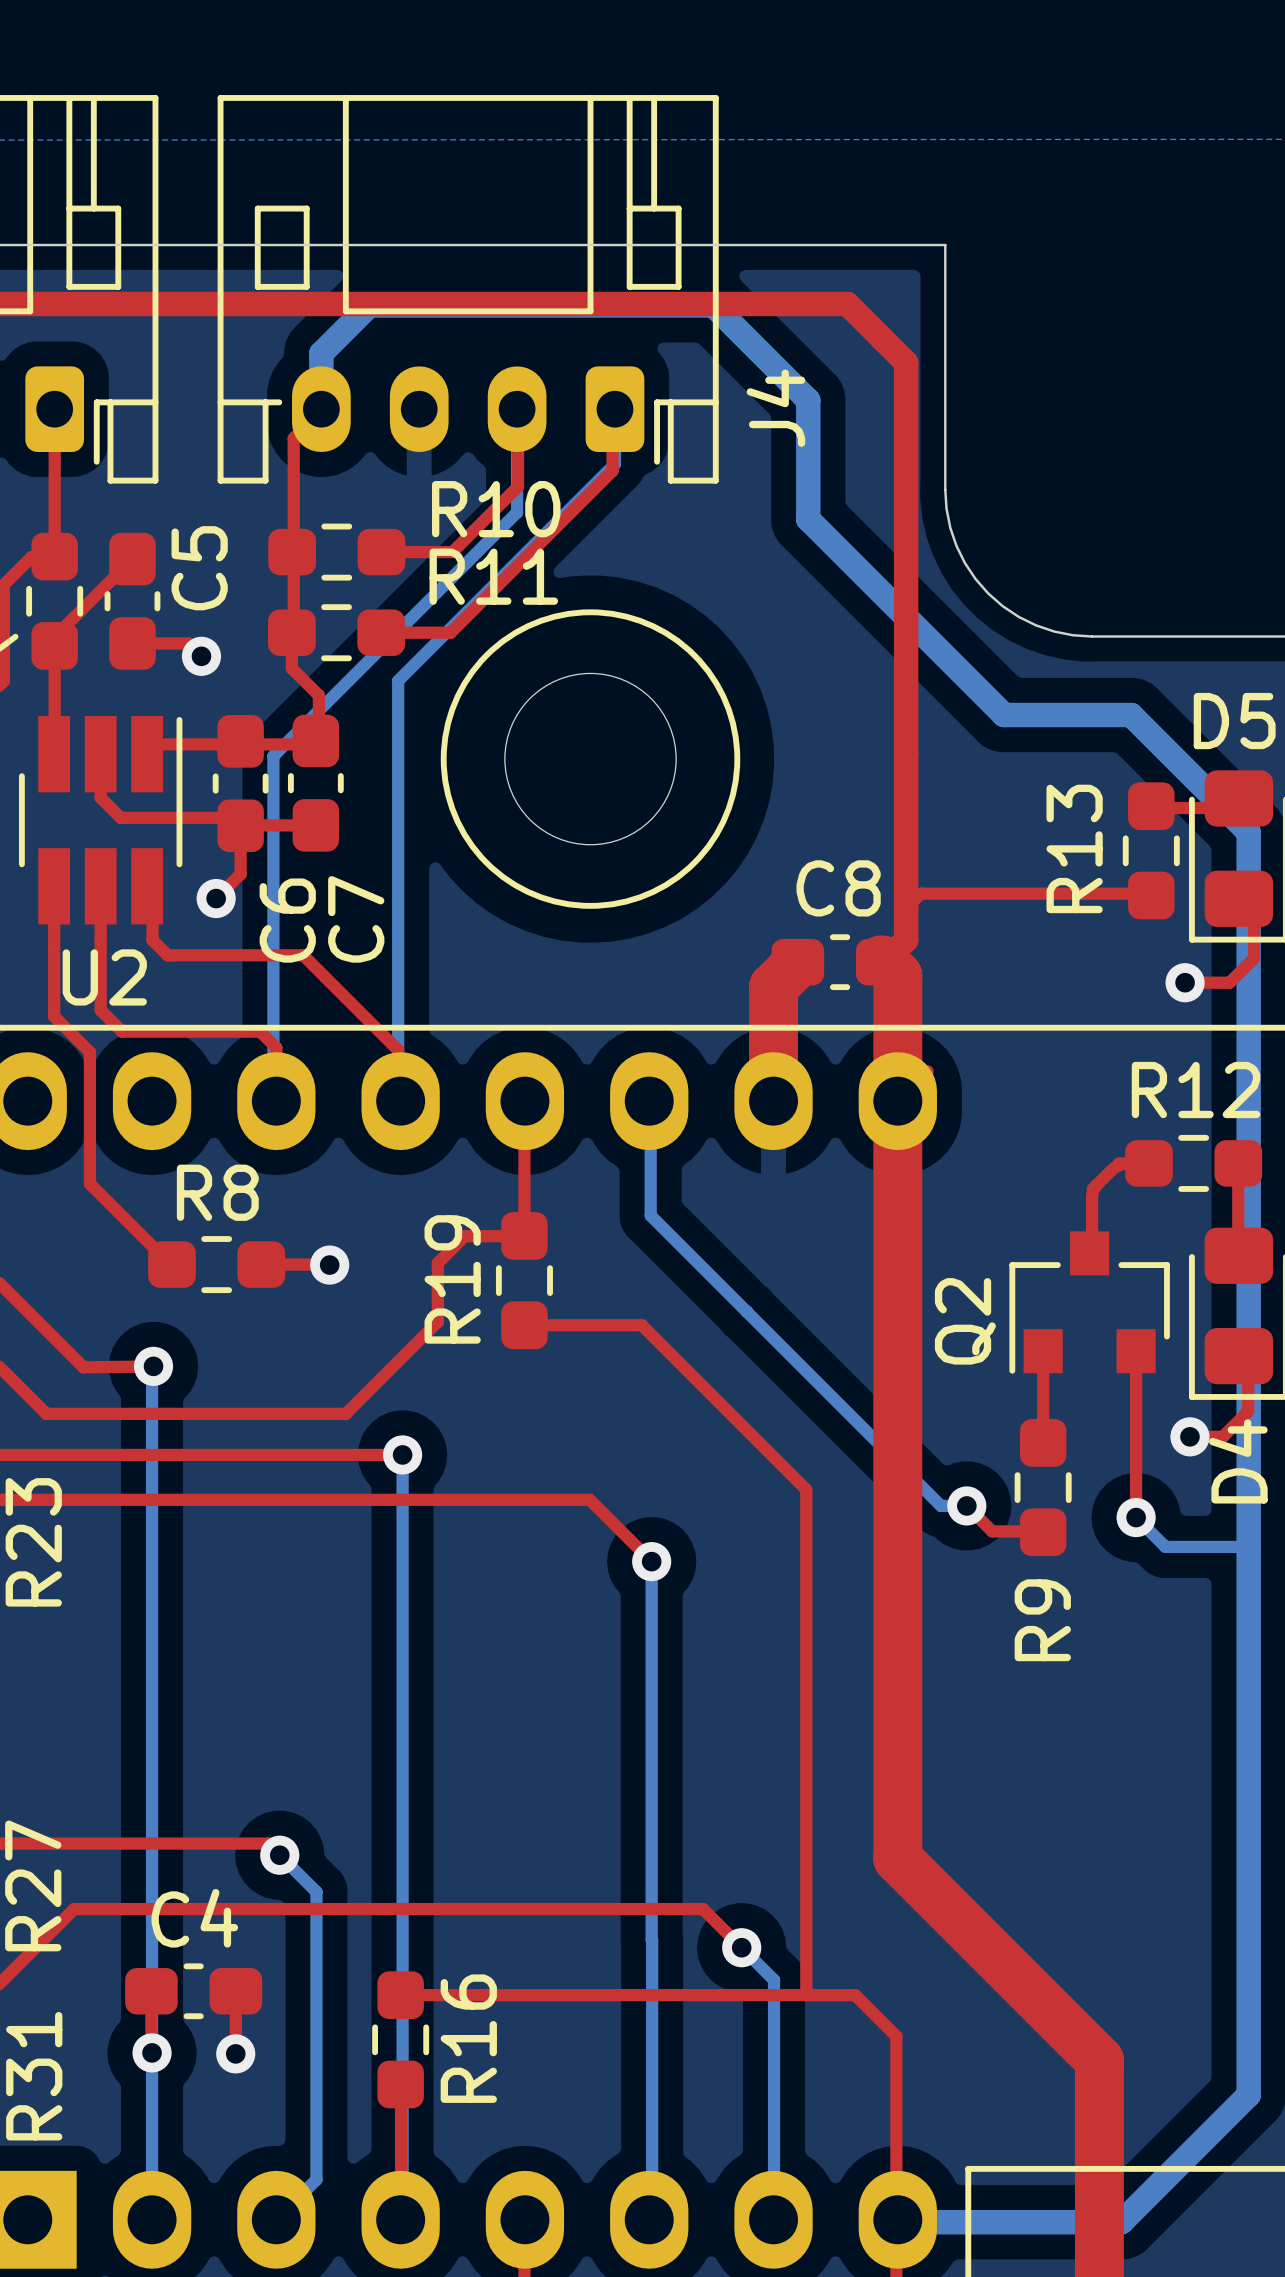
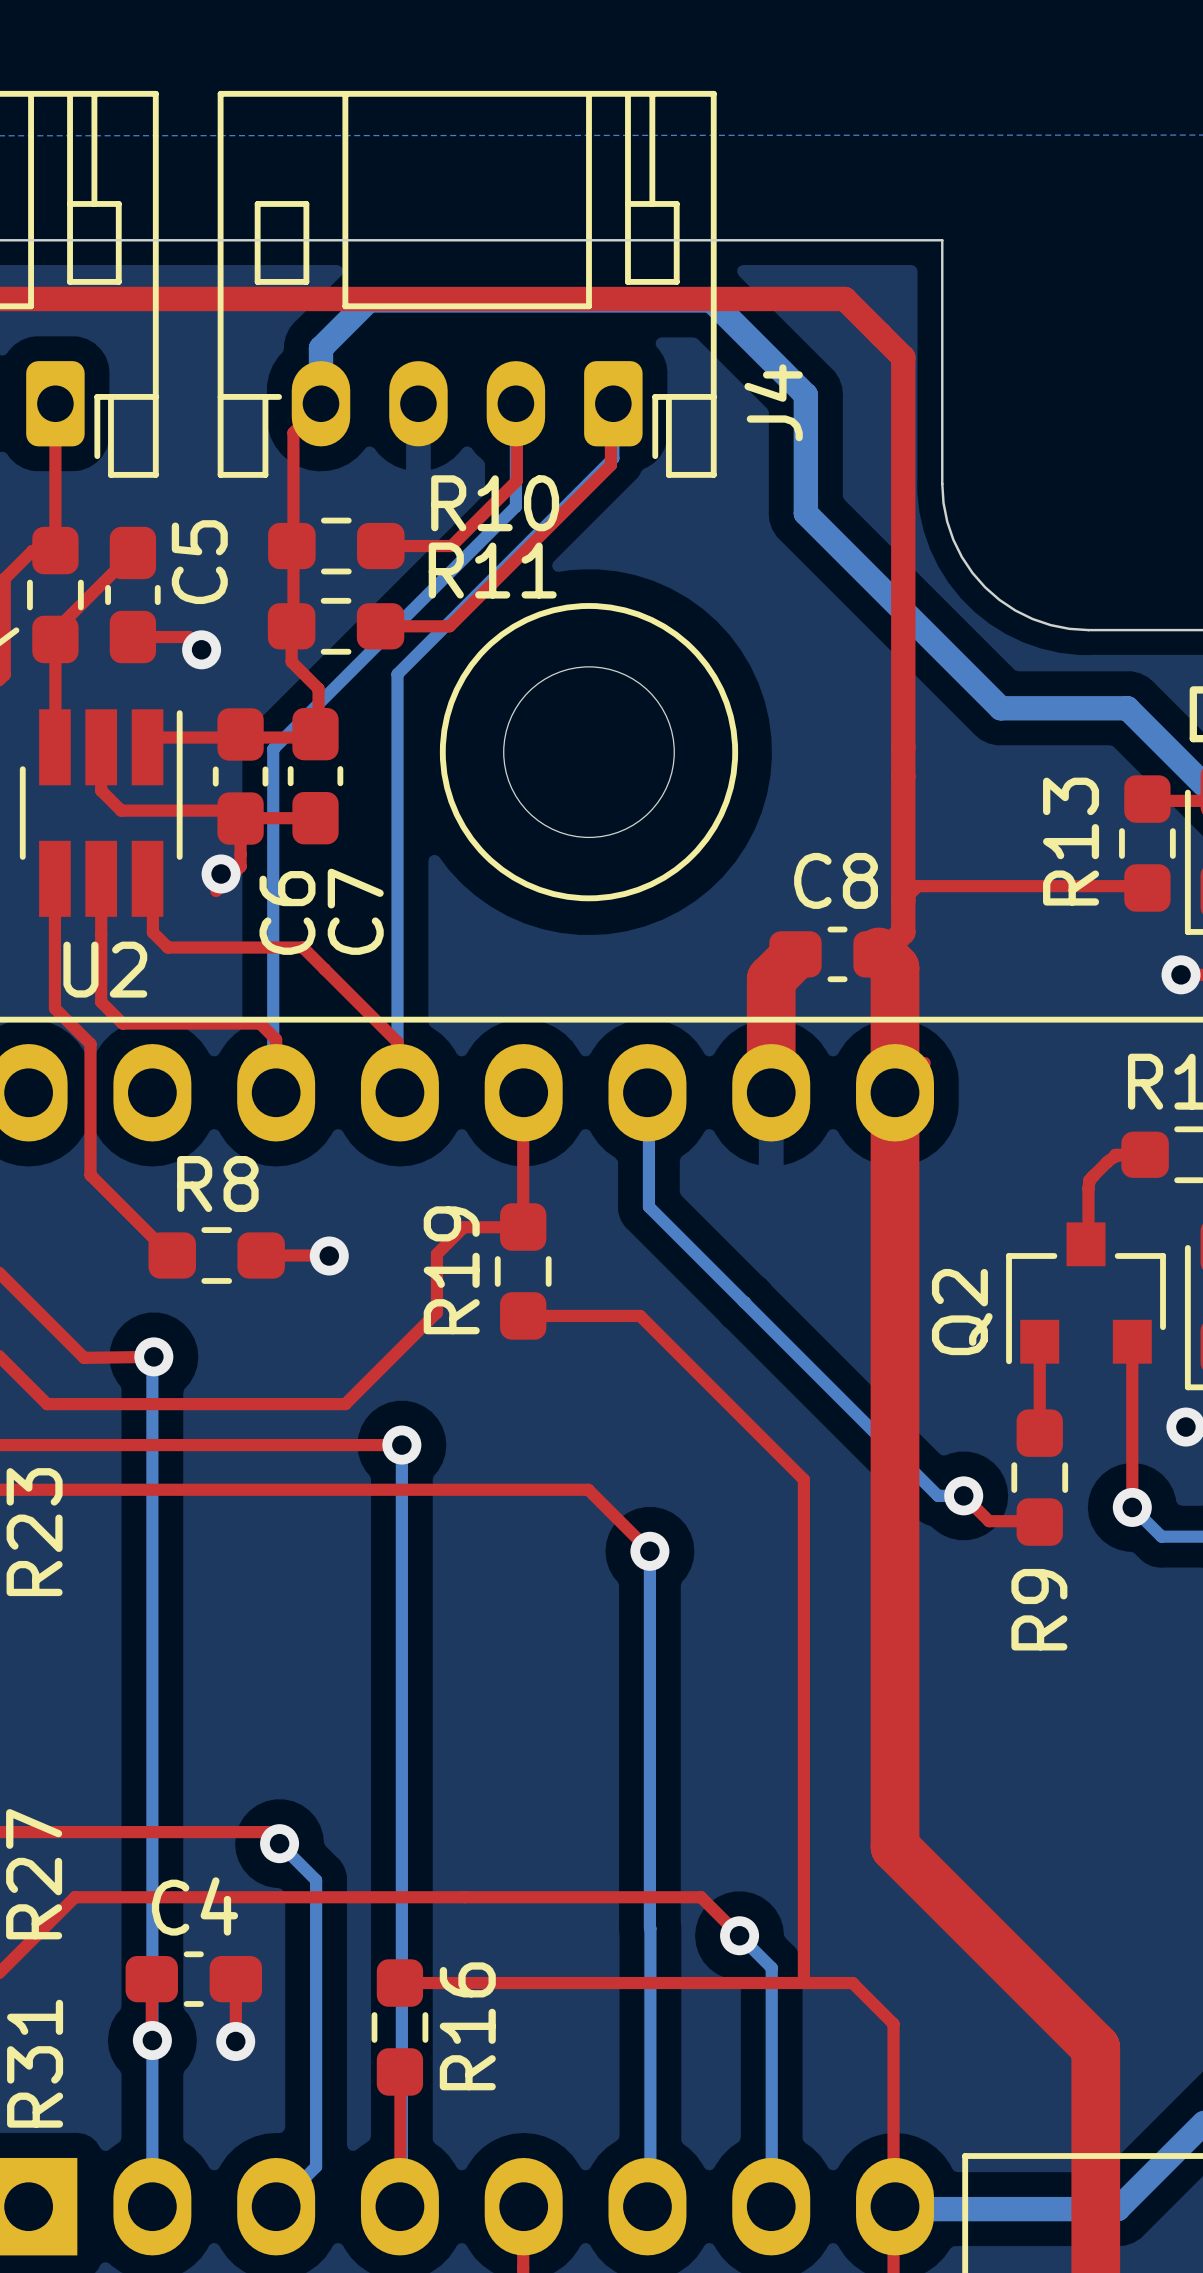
via position: (216, 898) -> (221, 873)

